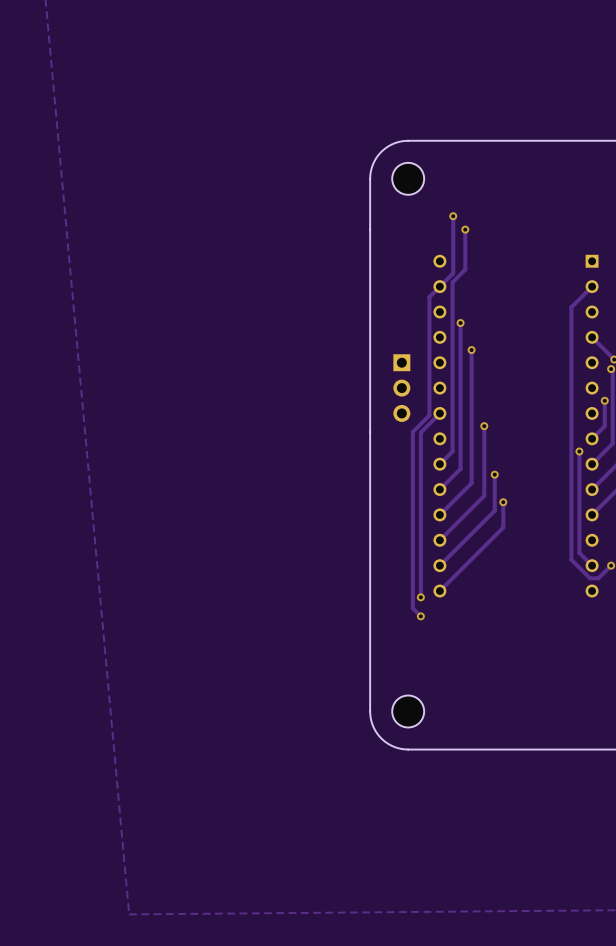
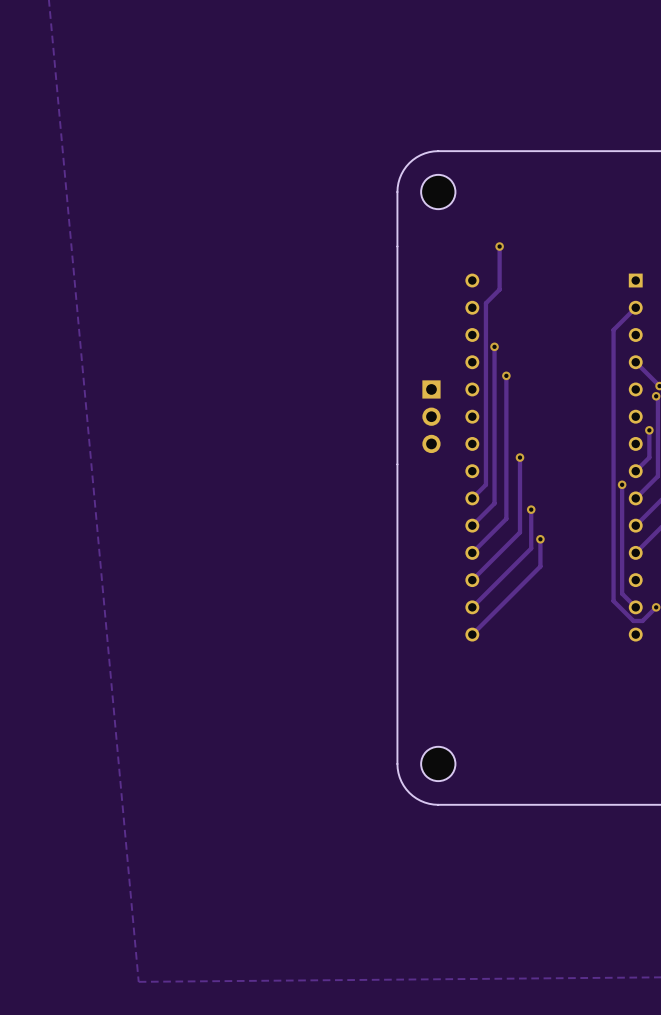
track: (453, 216) (453, 273) (429, 297) (429, 415) (412, 431) (412, 608) (420, 616) -> none
via: (453, 216) -> none
track: (439, 413) (420, 432) (420, 597) -> none
via: (420, 597) -> none
via: (420, 616) -> none

